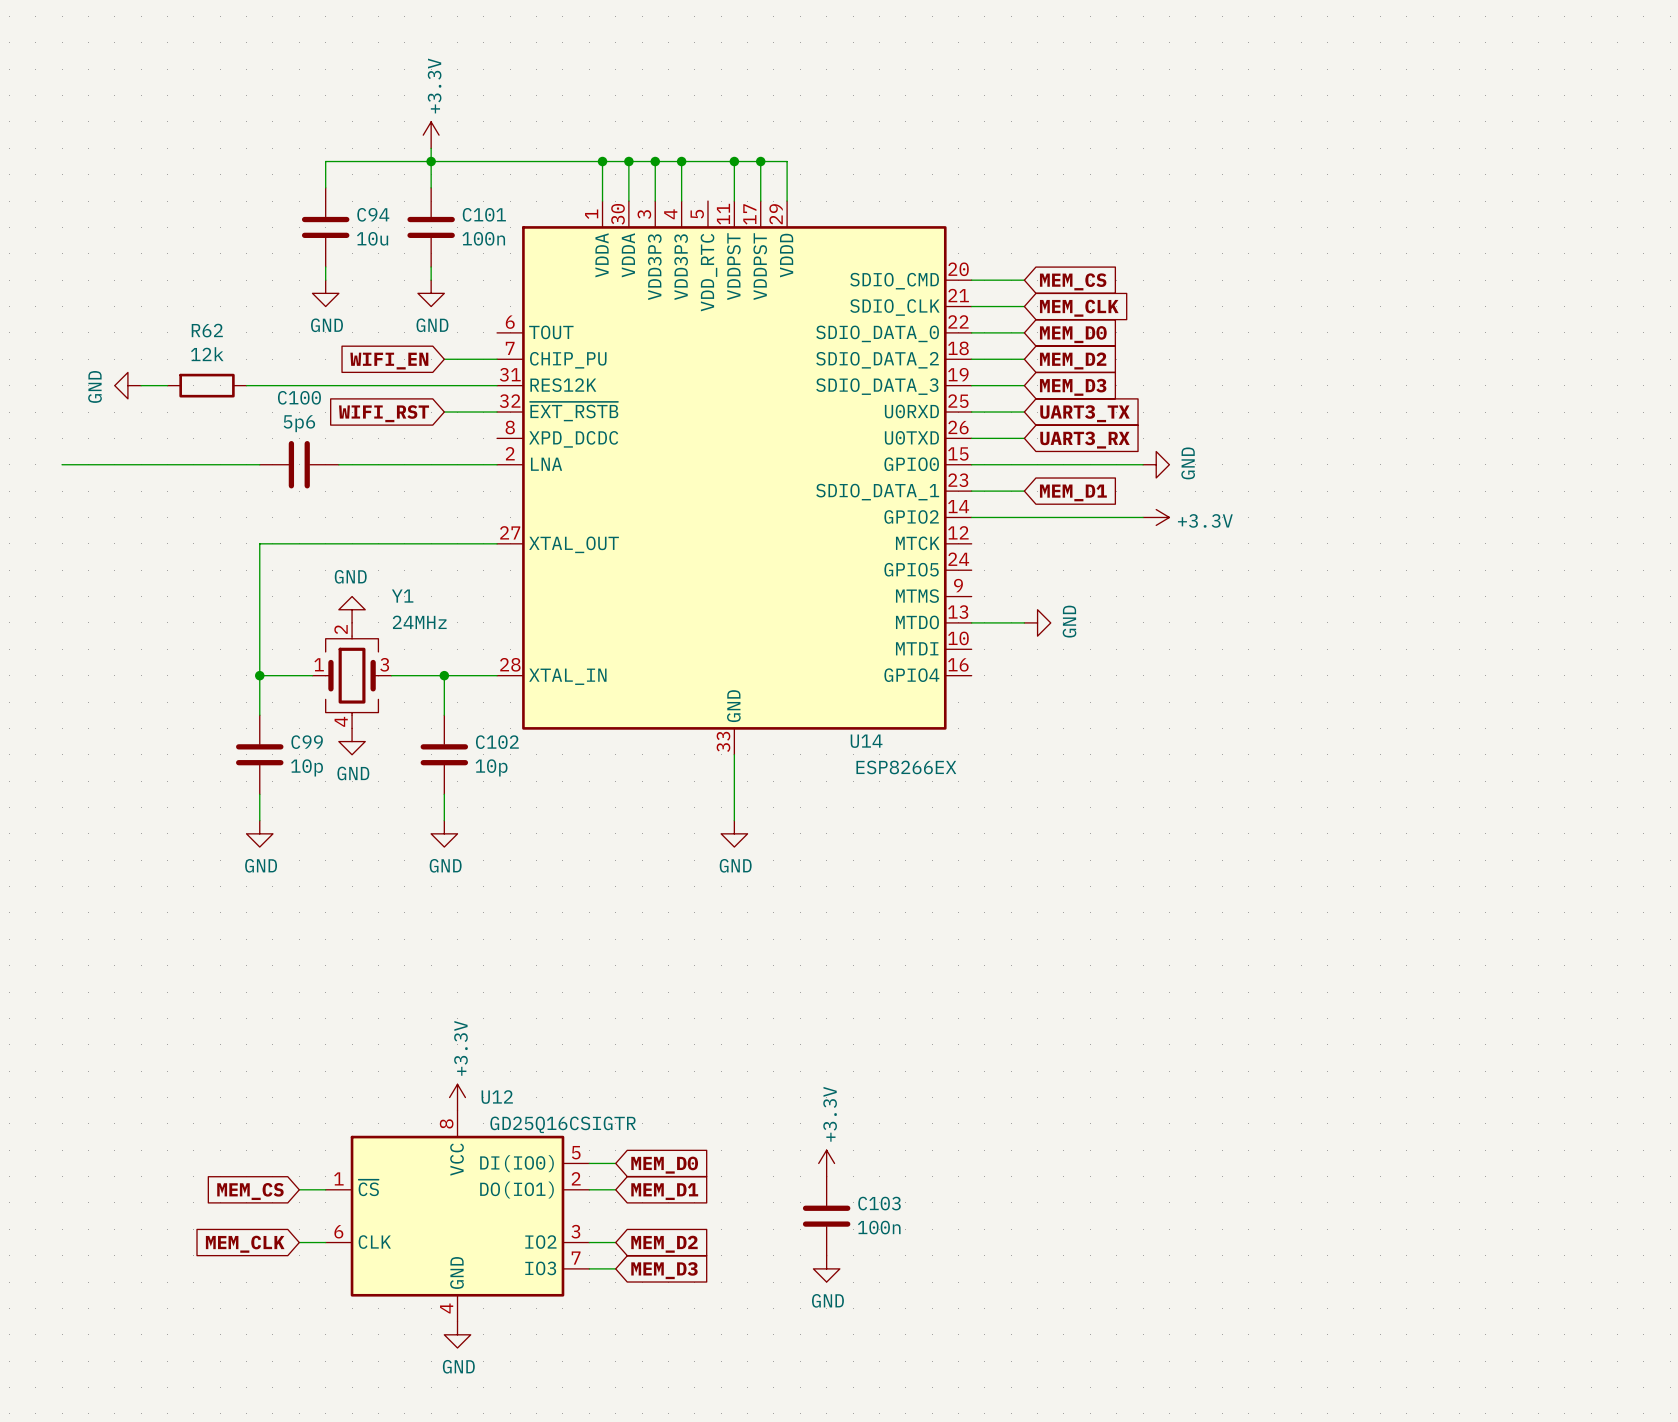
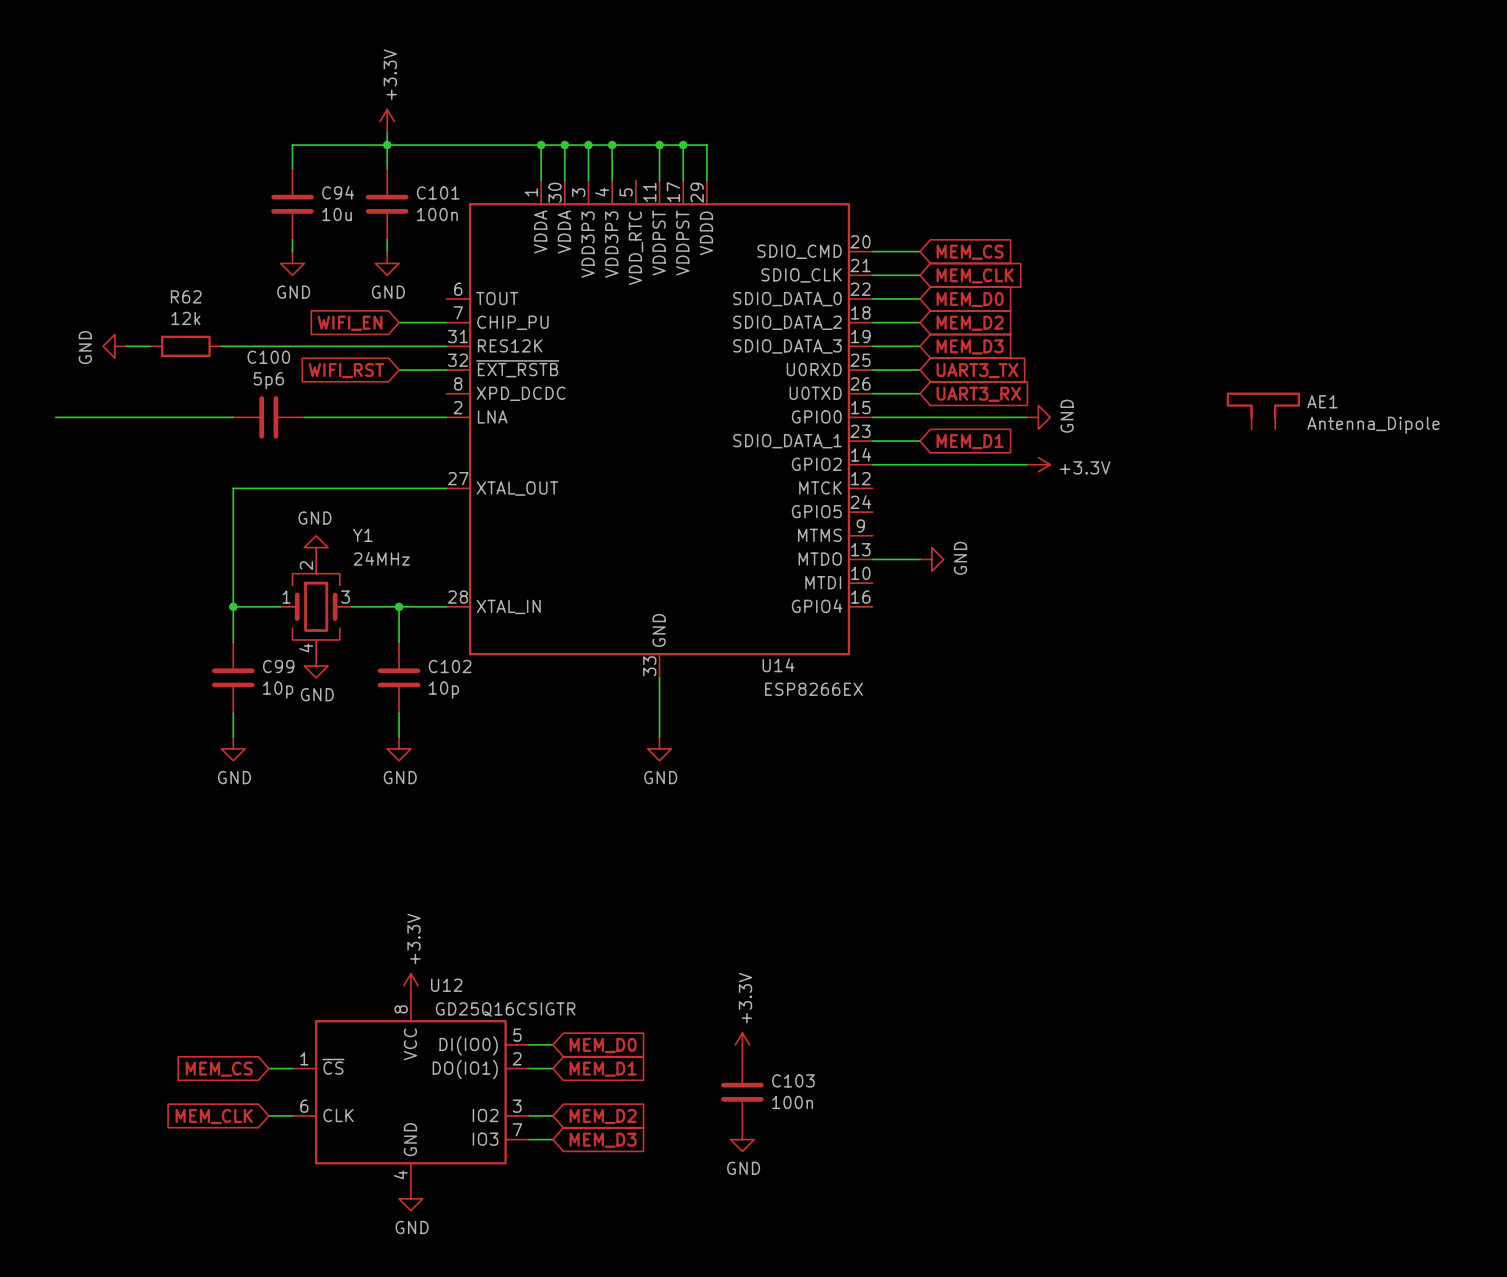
AE1: none -> Antenna_Dipole (1263, 410)

